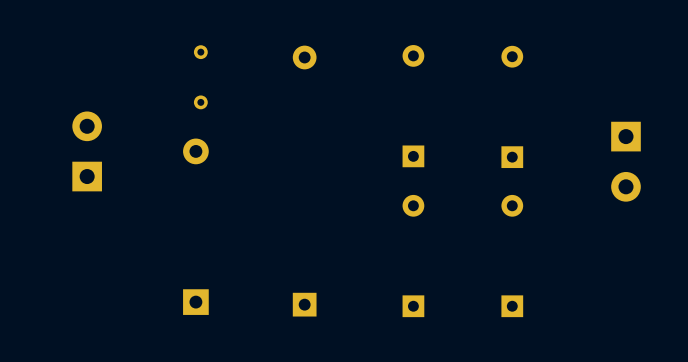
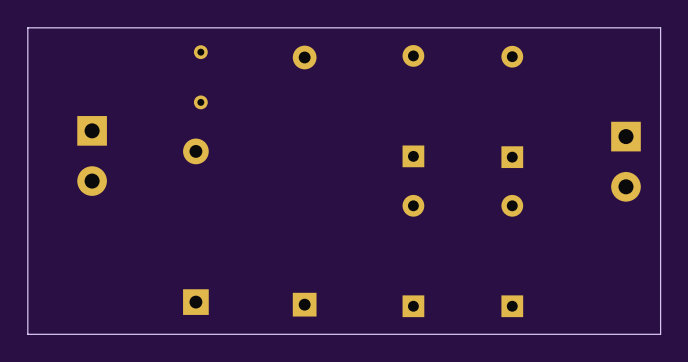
board edge: none -> (660, 27) (27, 27) (27, 334) (660, 334) (660, 27)
part rotation: 0° (87, 151) -> 180° (92, 155)

